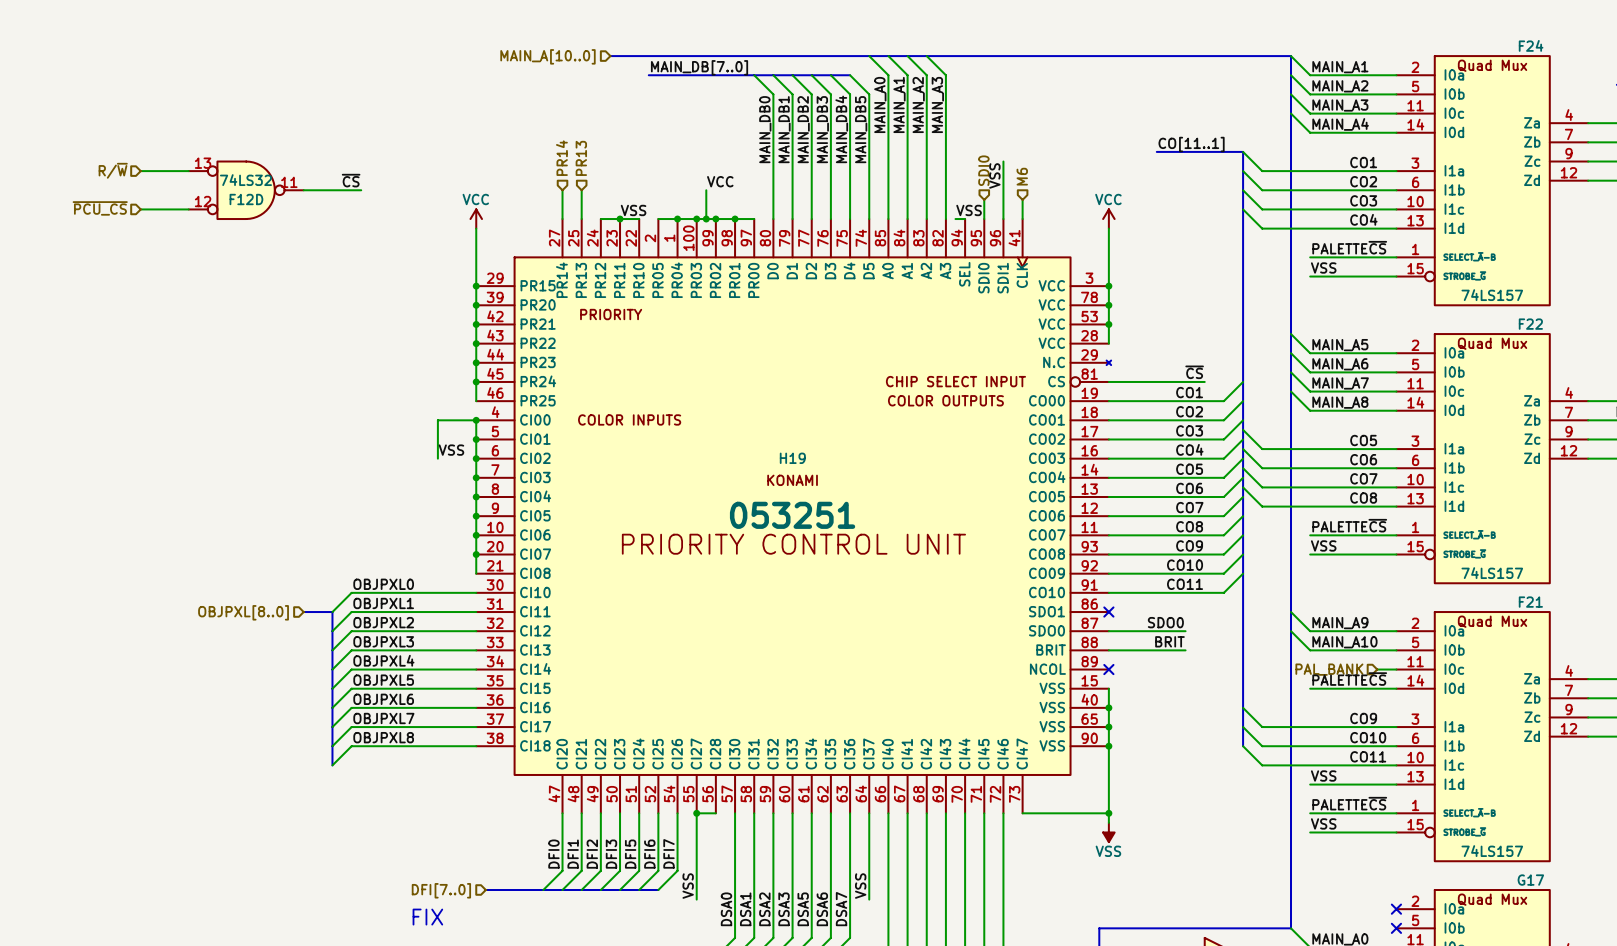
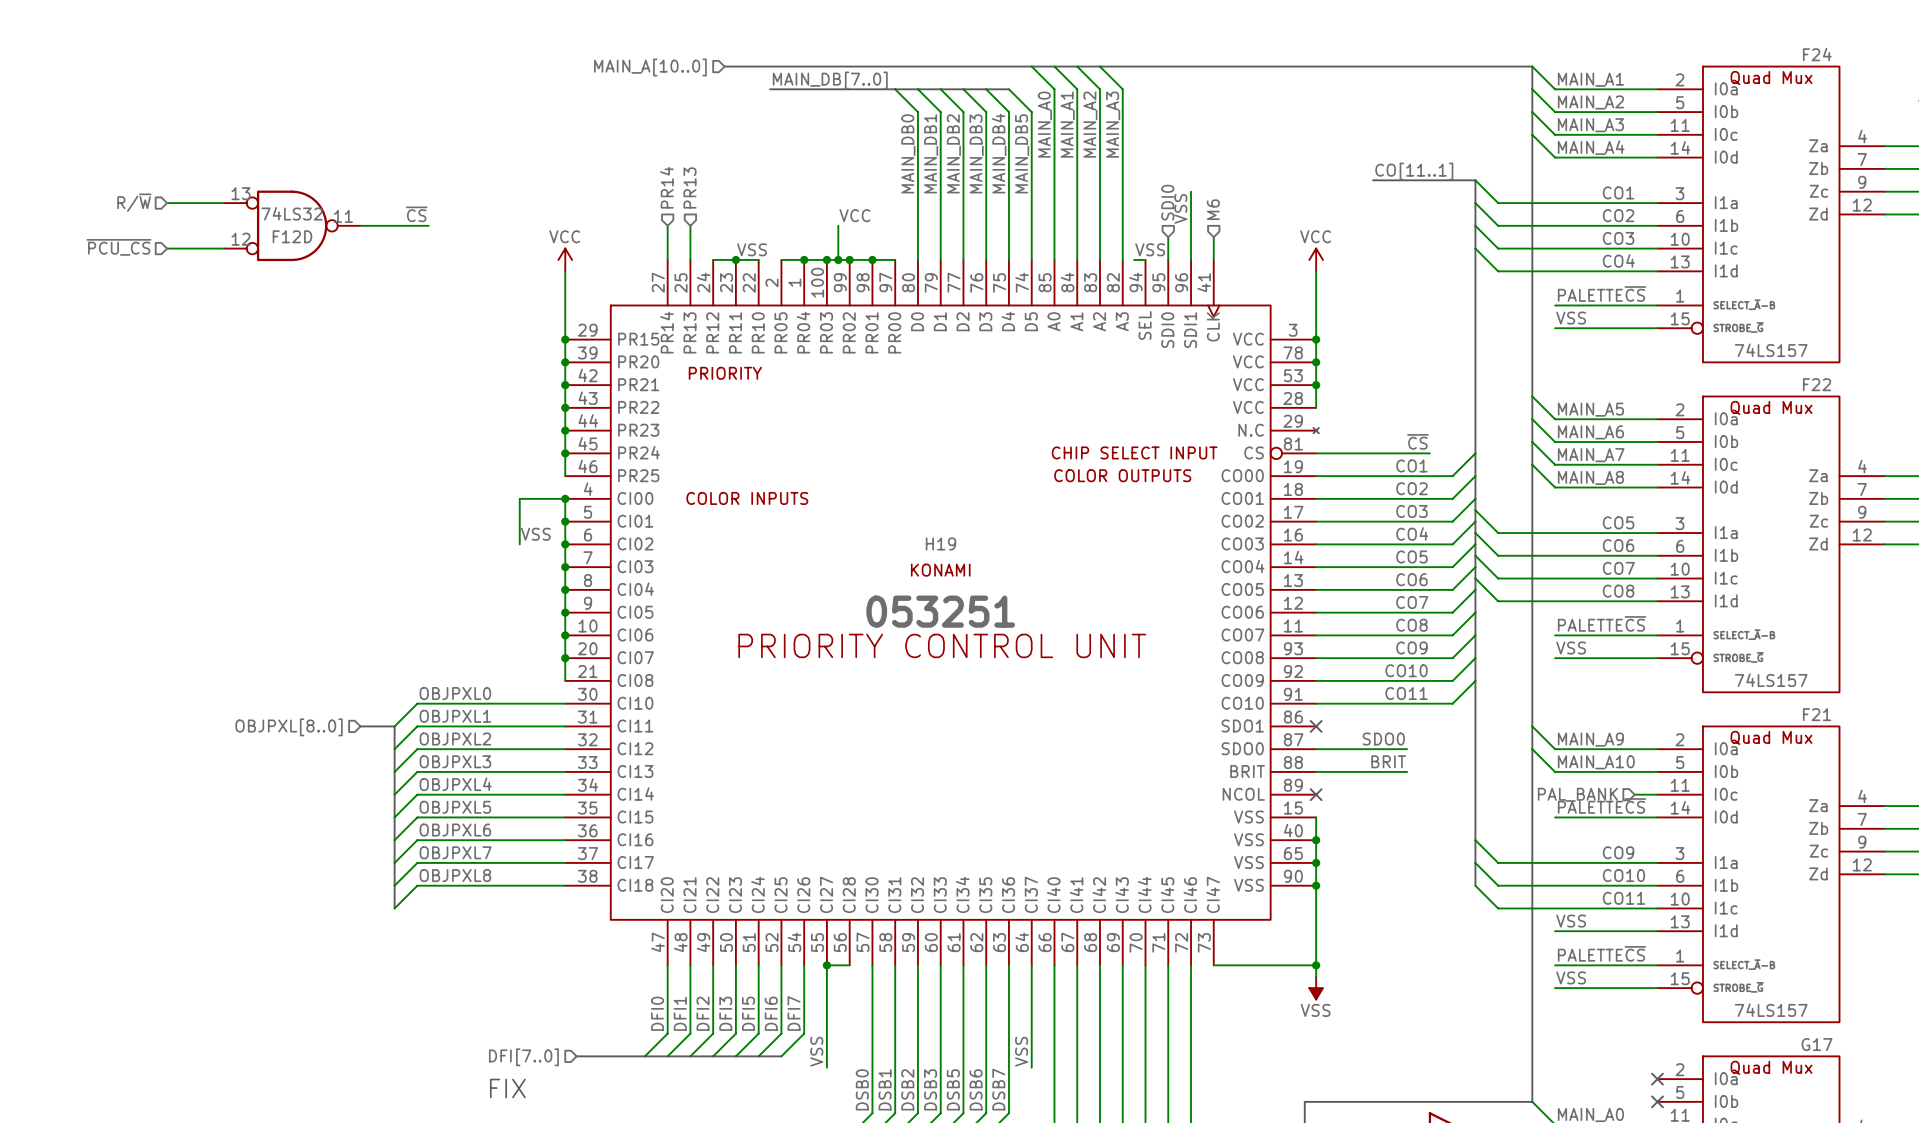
label: DSA0 (726, 909) -> DSB0 (862, 1089)
label: DSA1 (745, 909) -> DSB1 (885, 1089)
label: DSA2 (764, 909) -> DSB2 (907, 1089)
label: DSA3 (784, 909) -> DSB3 (930, 1089)
label: DSA5 (803, 909) -> DSB5 (953, 1089)
label: DSA6 (822, 909) -> DSB6 (976, 1089)
label: DSA7 (841, 909) -> DSB7 (998, 1089)

